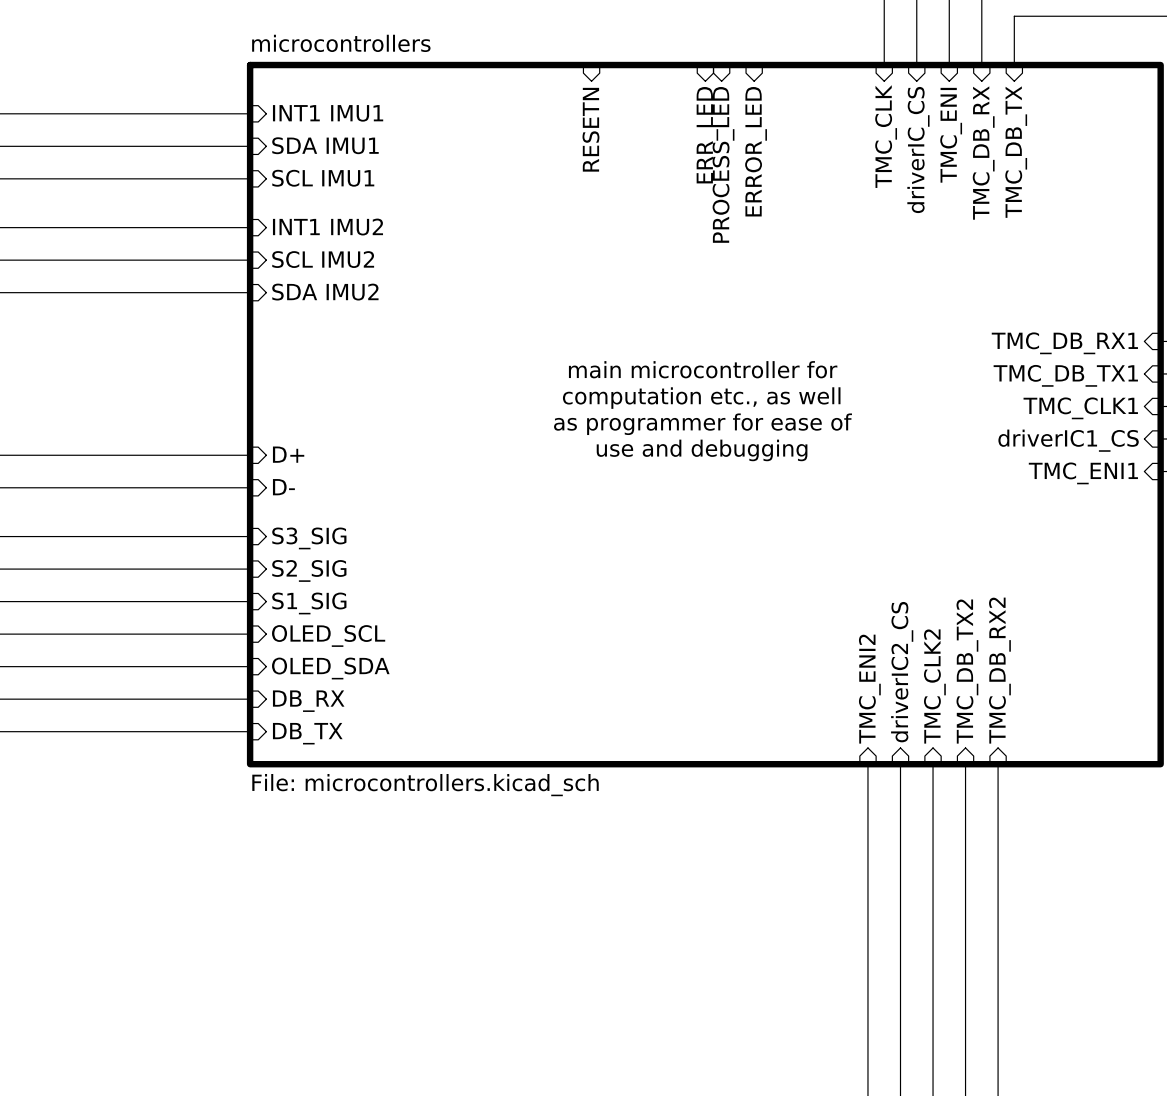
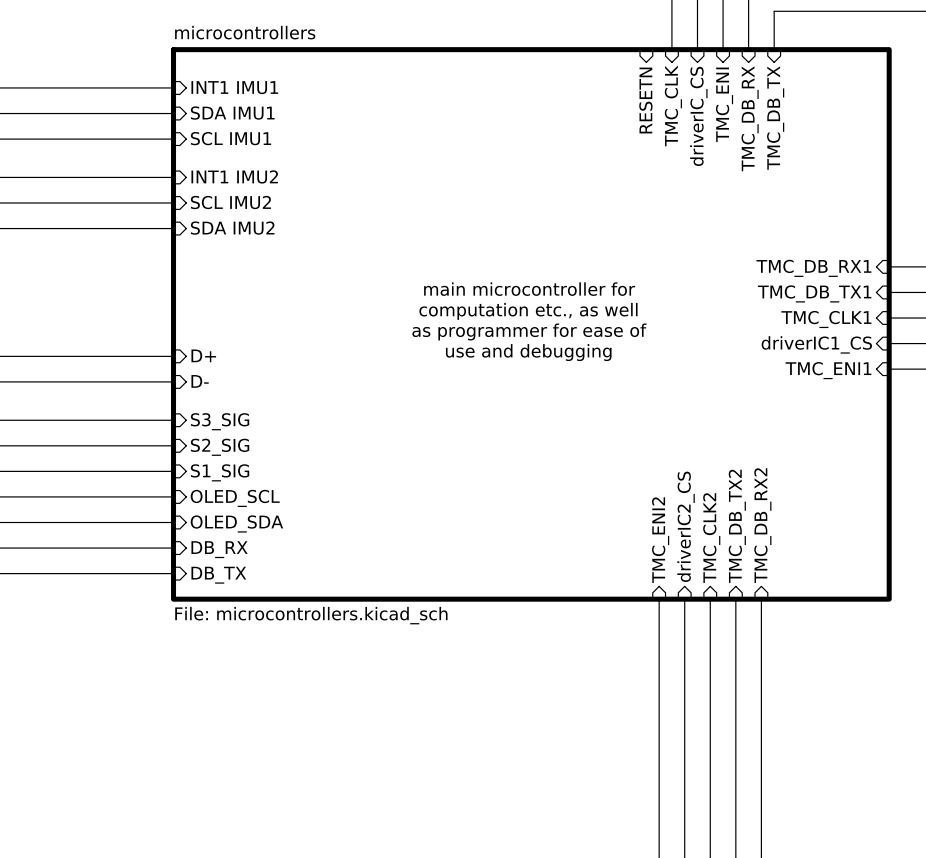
sheet pin position: RESETN (590, 129) -> RESETN (645, 100)
sheet pin: ERR_LED (707, 135) -> none
sheet pin: ERROR_LED (756, 151) -> none
sheet pin: PROCESS_LED (723, 164) -> none

